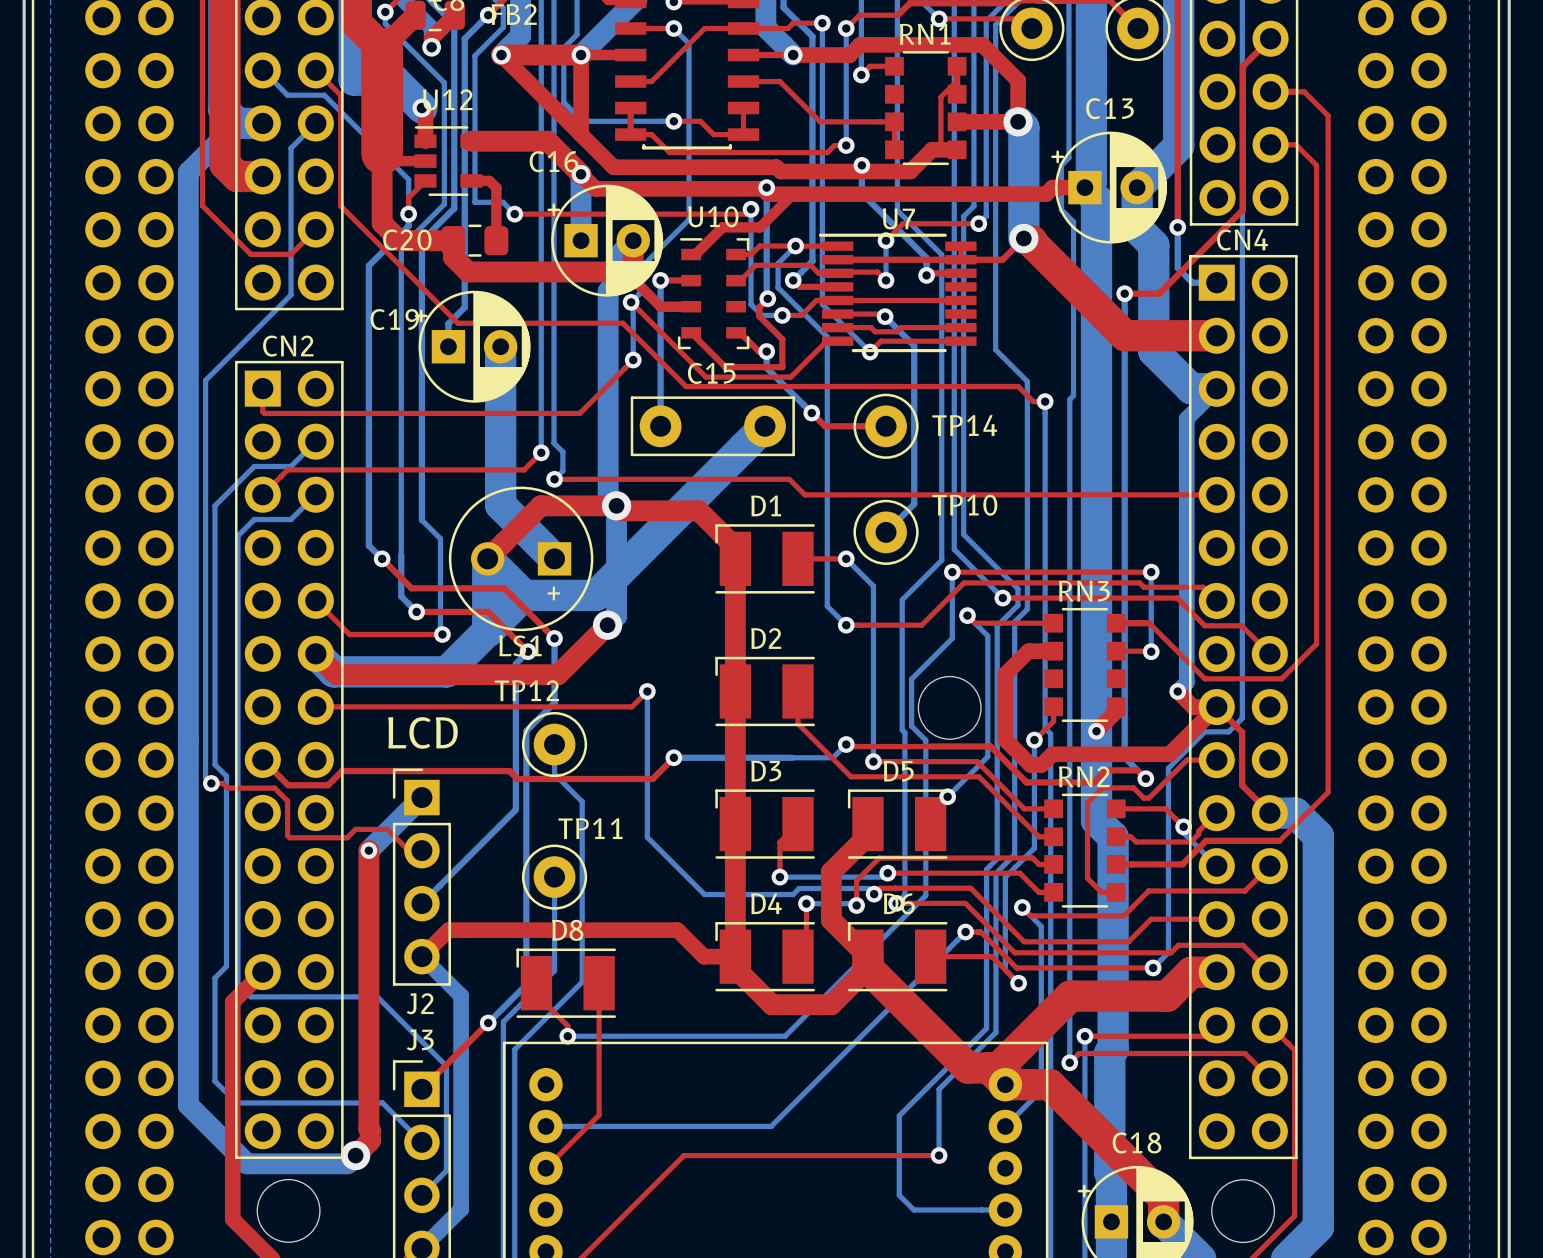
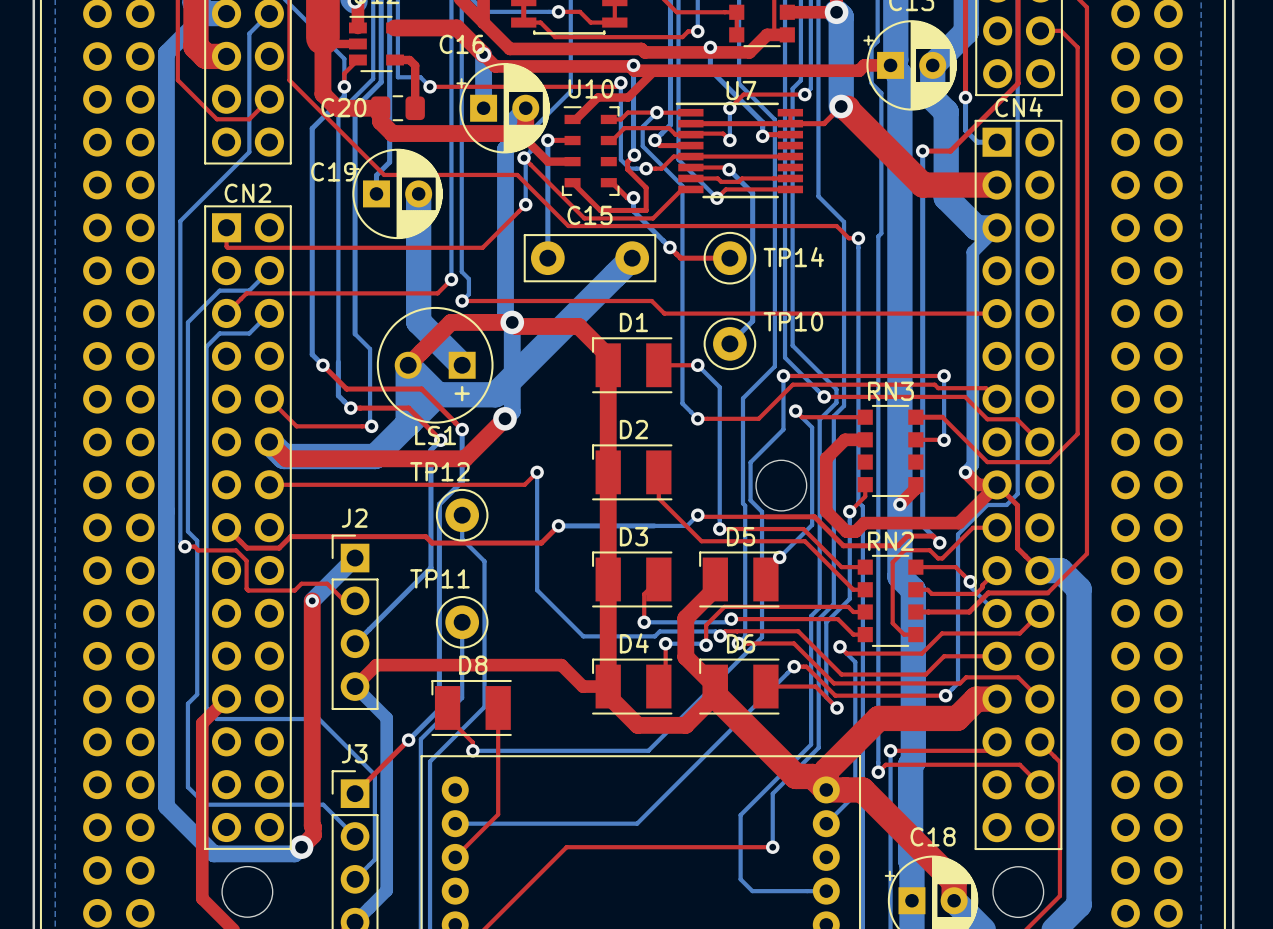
text: LCD (422, 732) -> none
TP11 name position: TP11 (590, 828) -> TP11 (439, 578)
J2 name position: J2 (420, 1003) -> J2 (354, 518)

